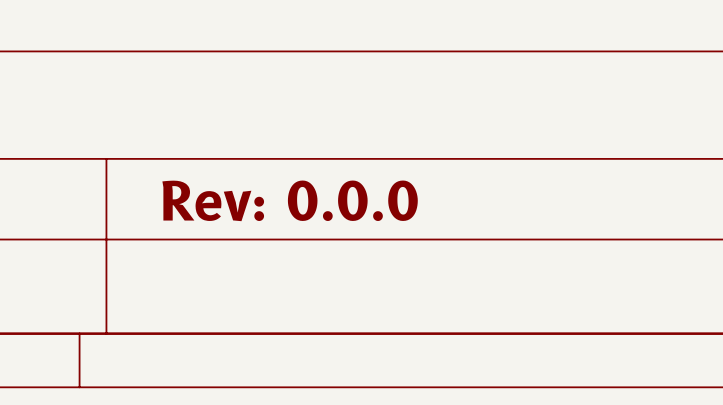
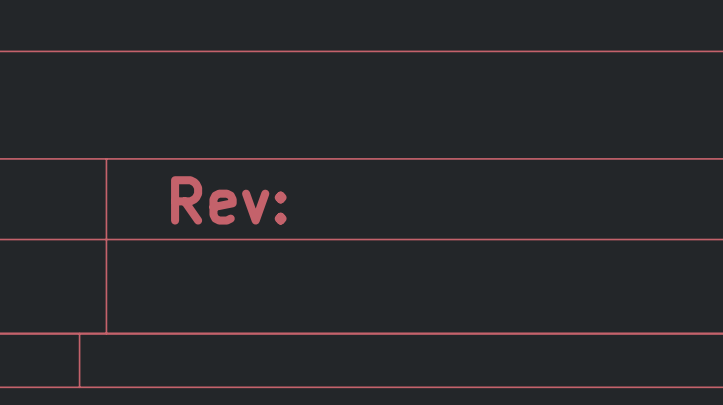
title block: Rev: 0.0.0 (290, 200) -> Rev: (228, 200)

